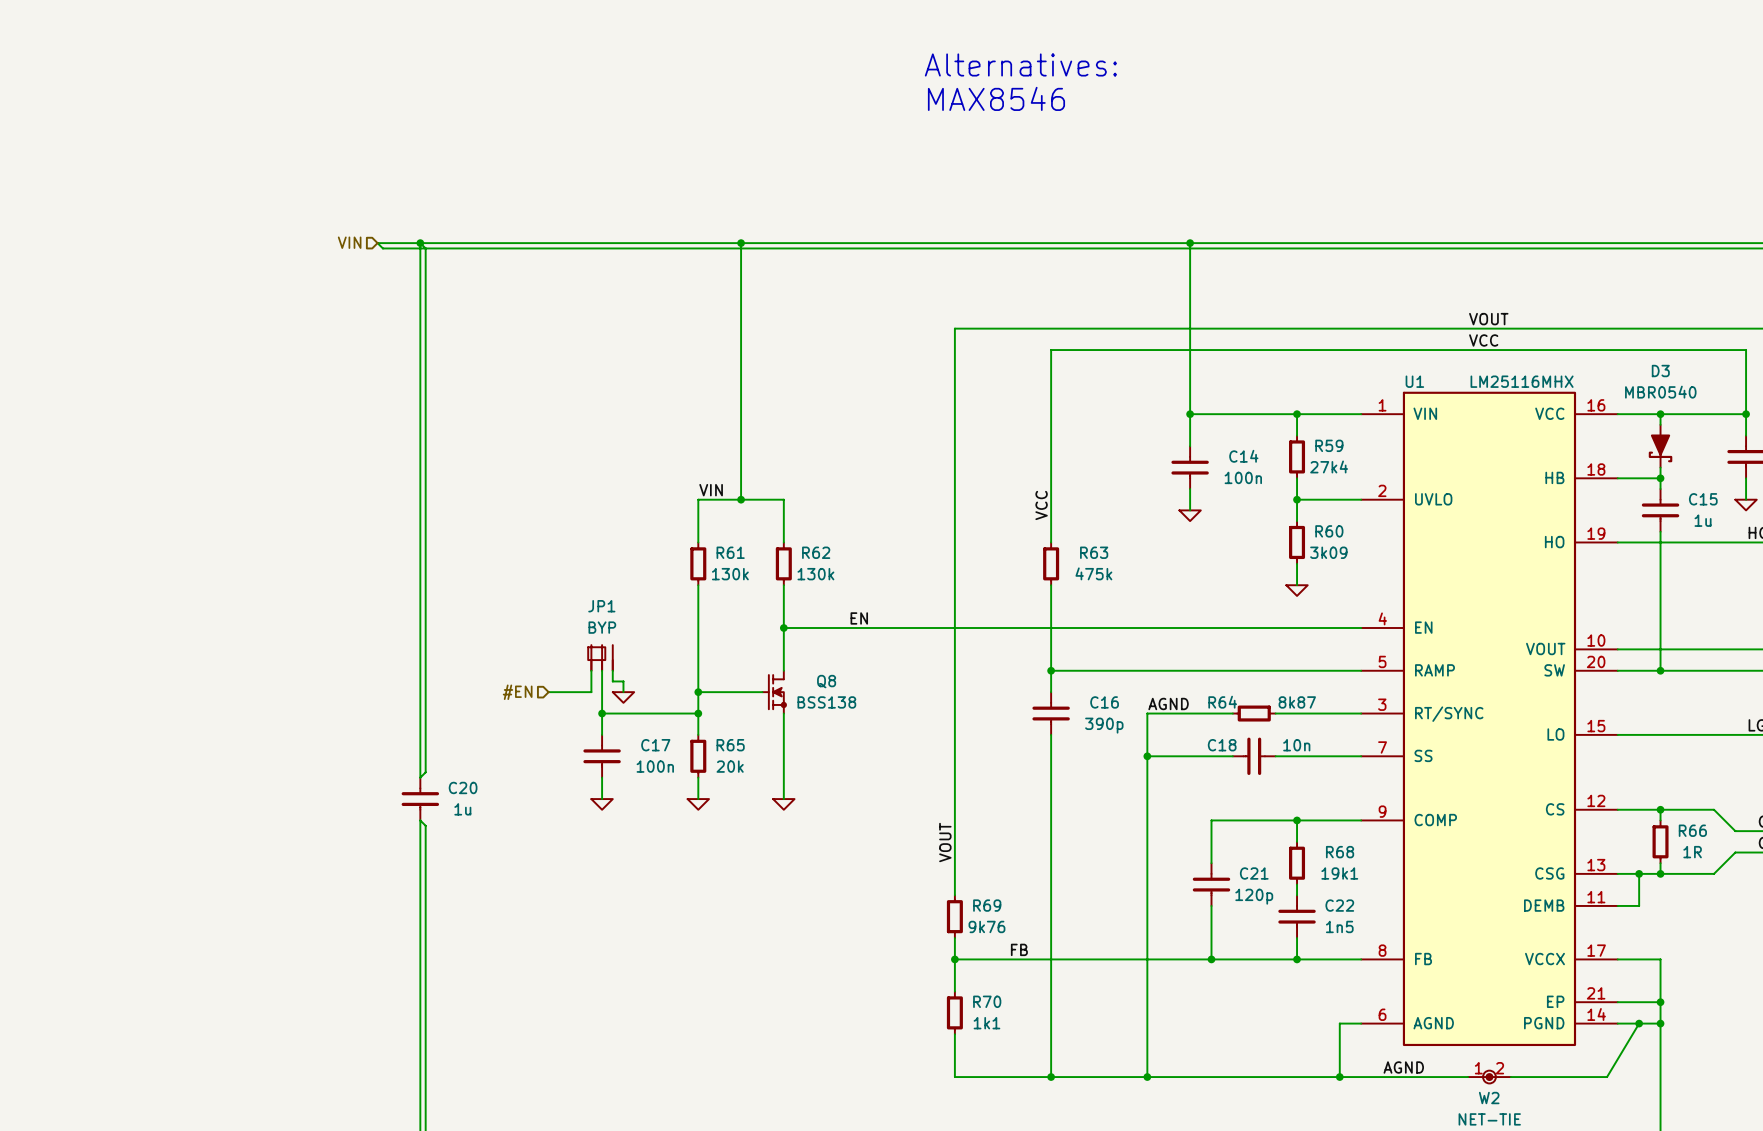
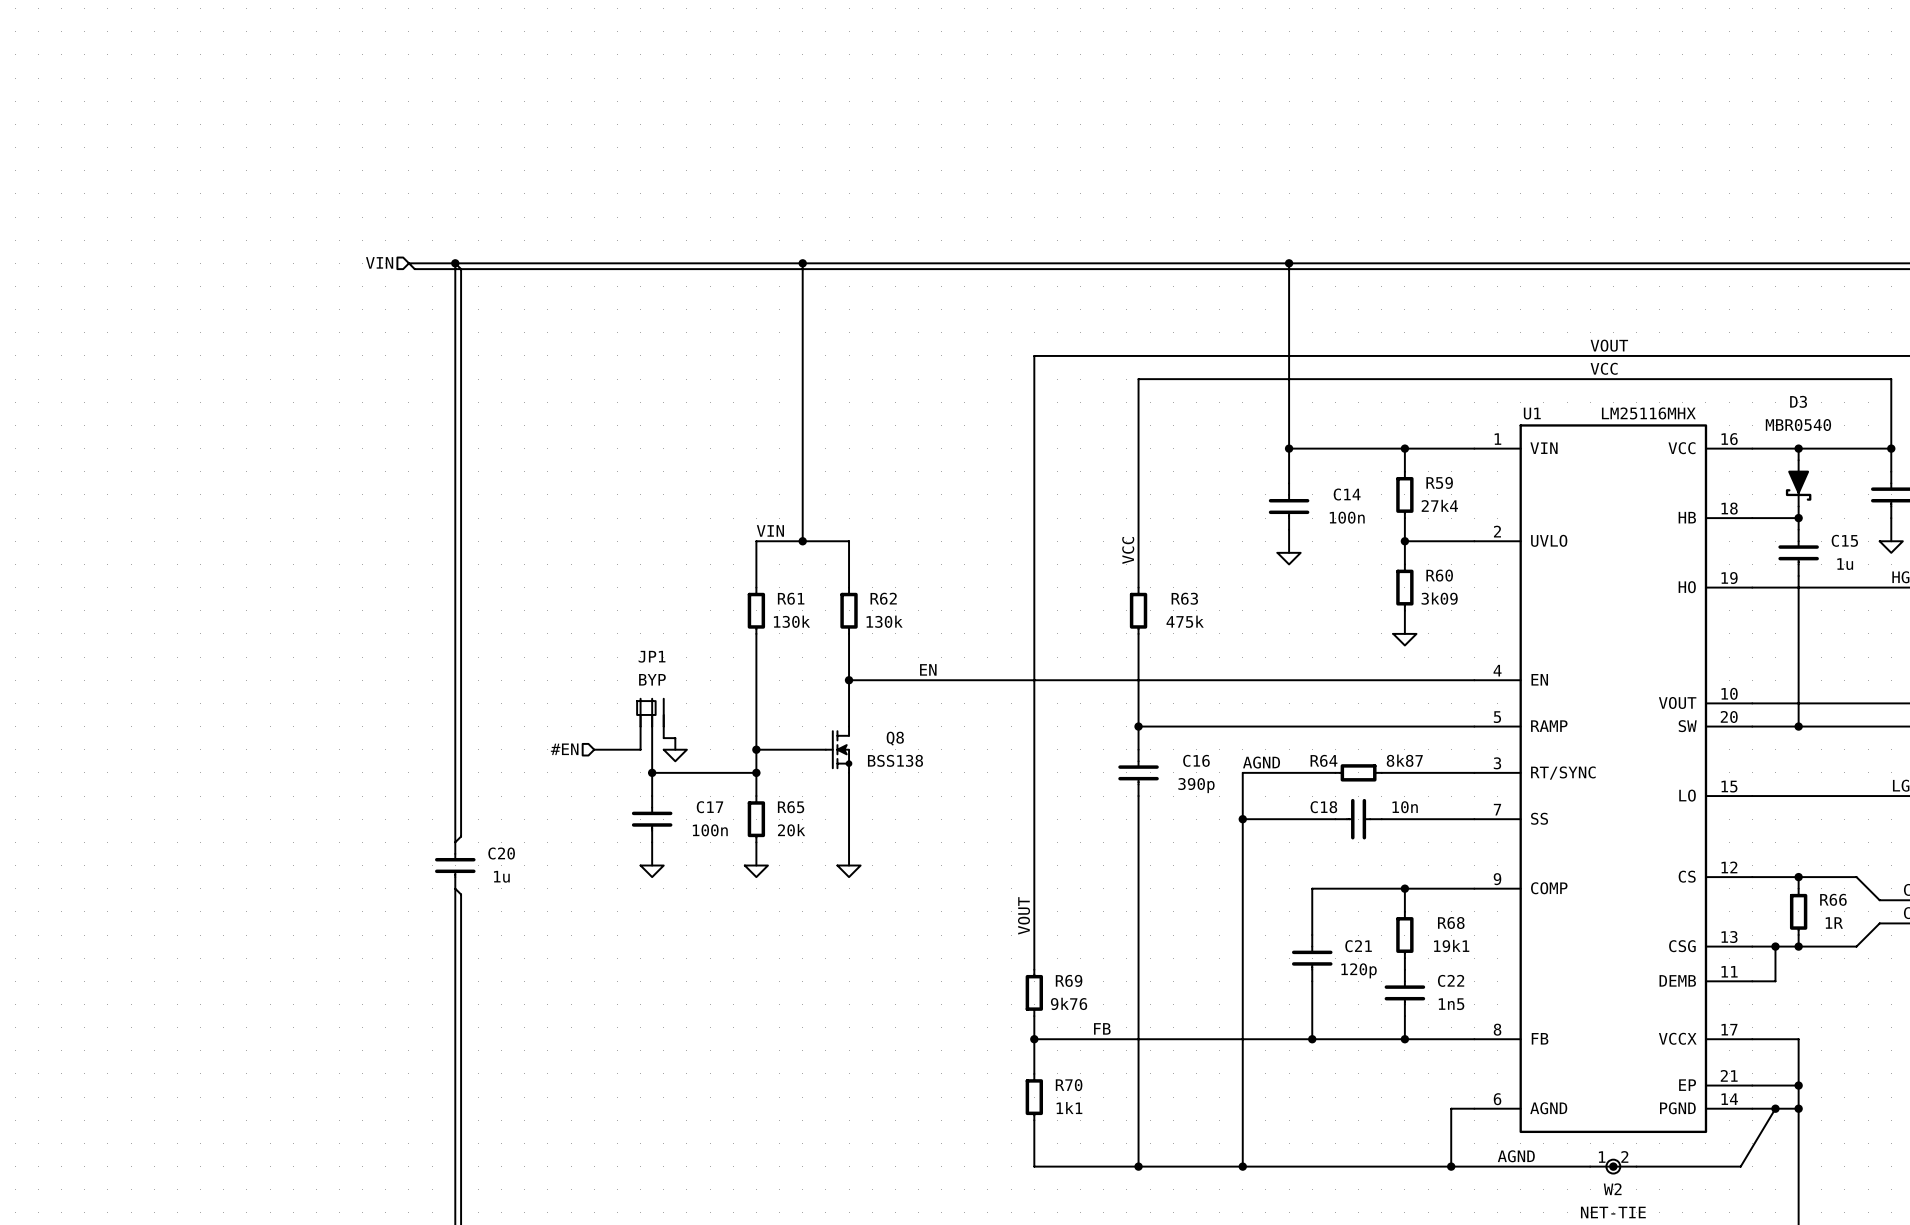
text: Alternatives: (1020, 64) -> none
text: MAX8546 (996, 98) -> none

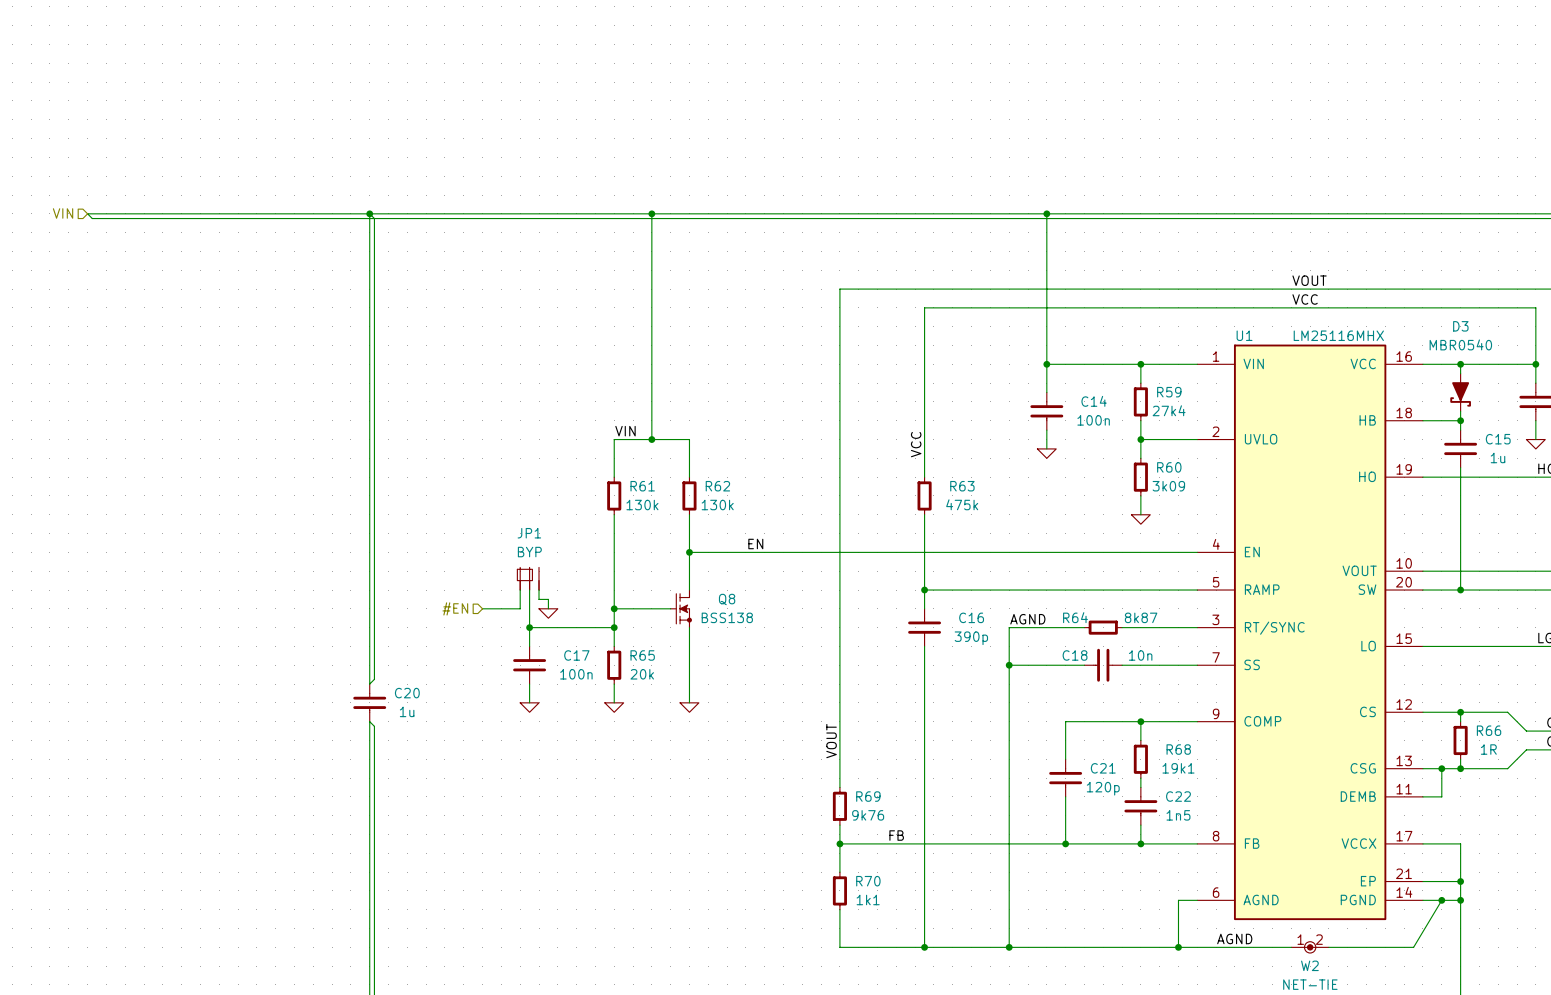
hierarchical label: none -> VIN (63, 213)
hierarchical label: VIN (379, 262) -> none
wire: (408, 263) (414, 269) -> (332, 213) (87, 213) (92, 218) (336, 218)

